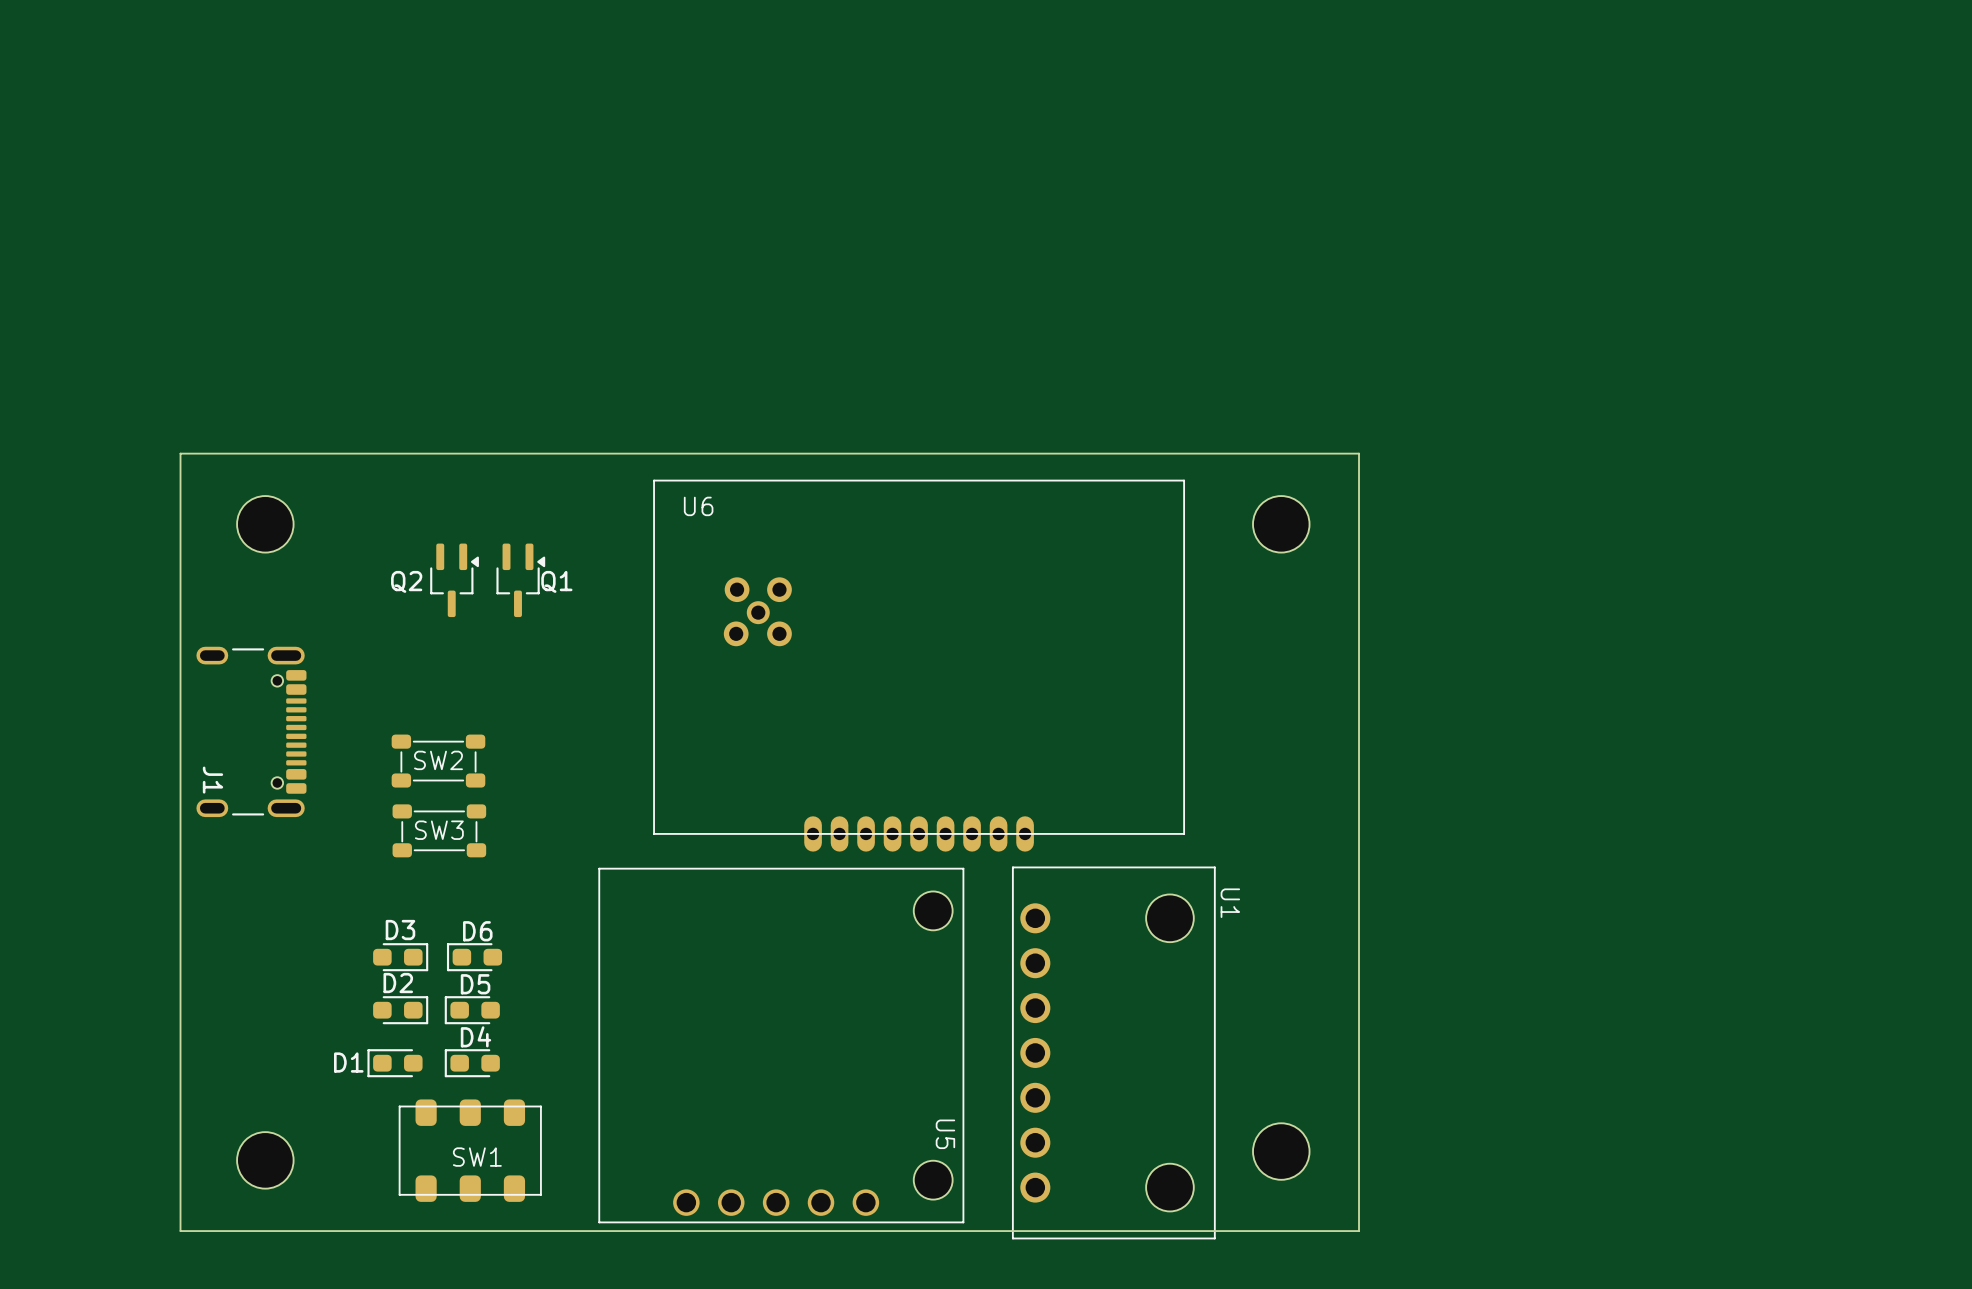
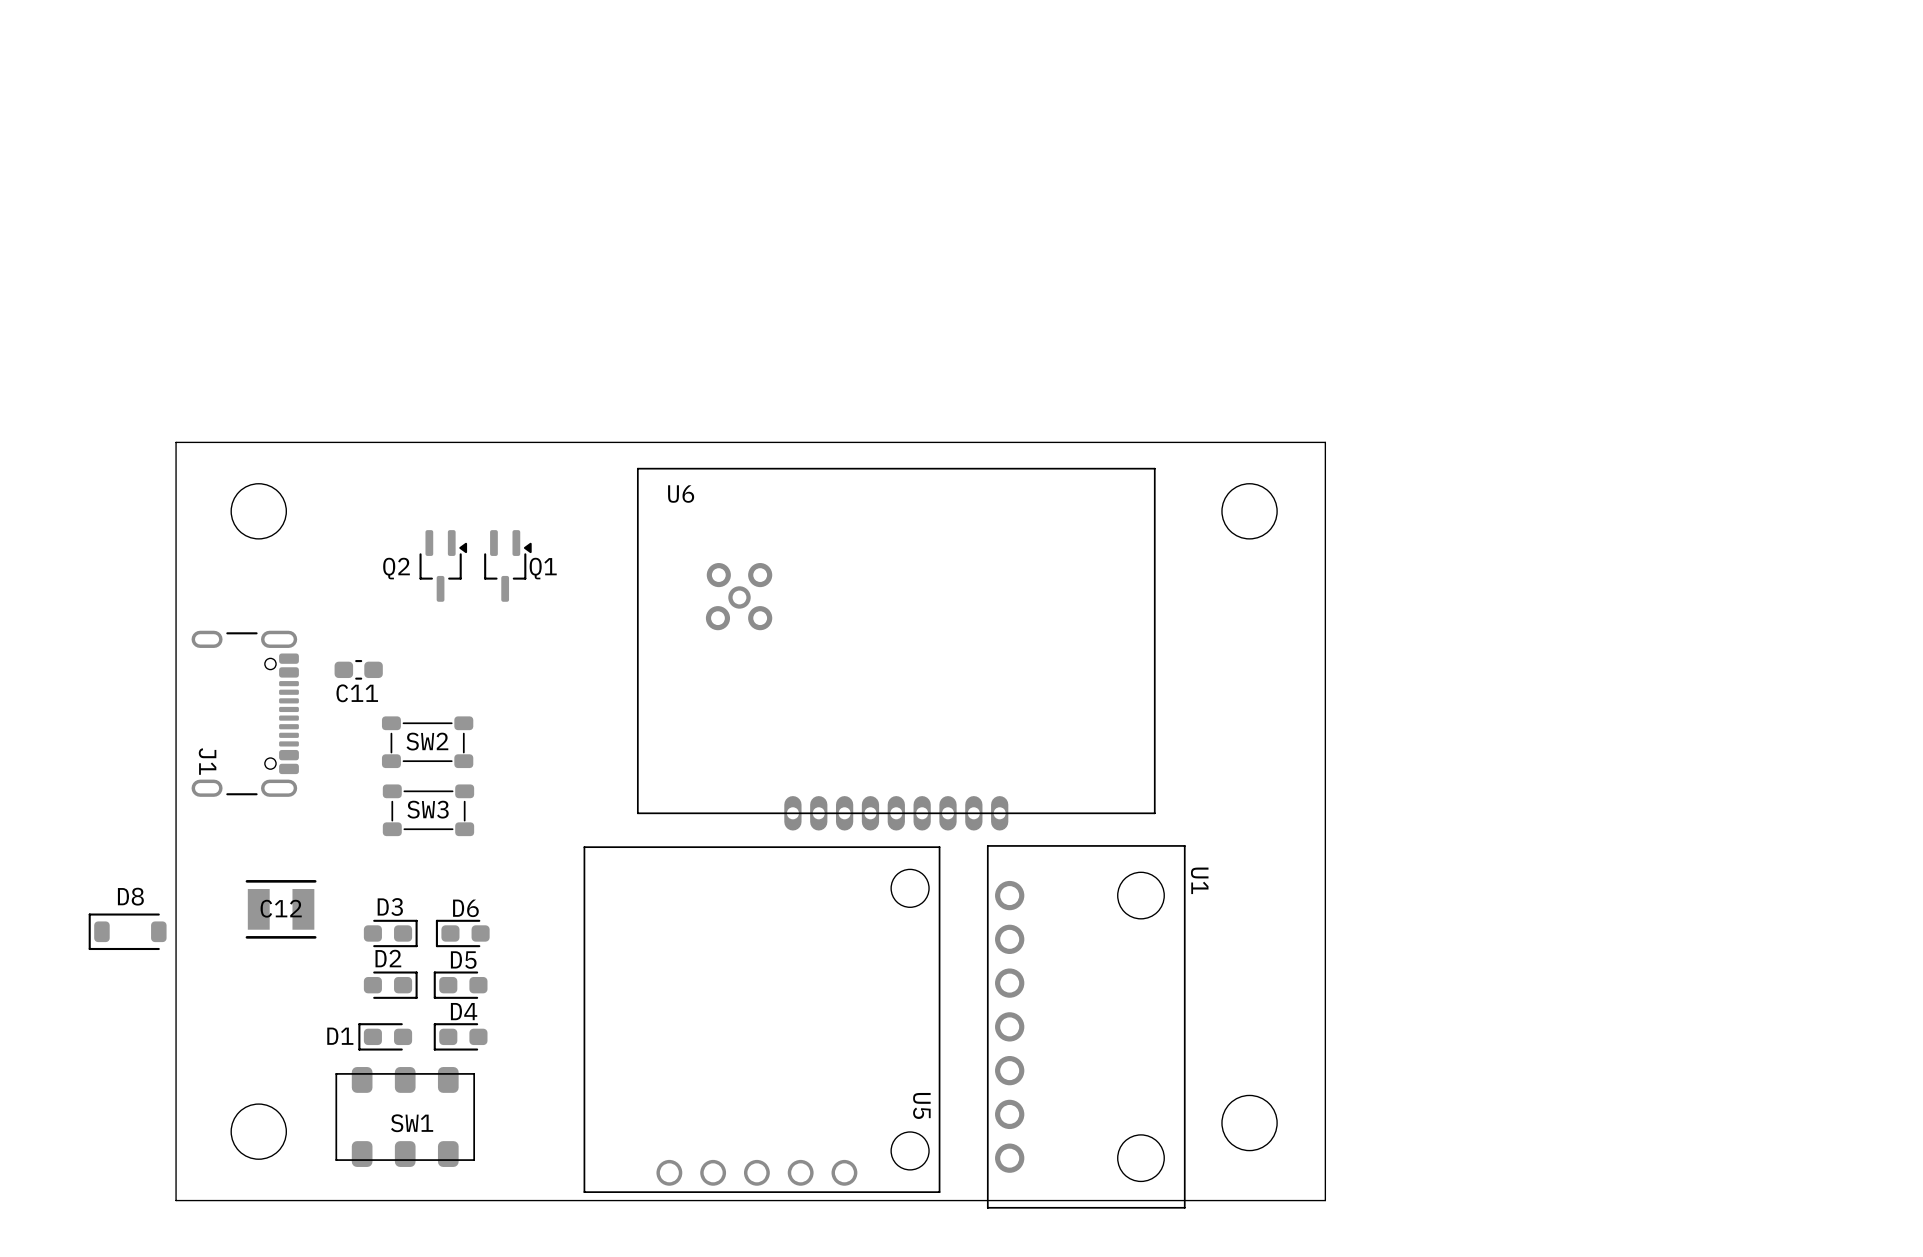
C11: none -> (358, 669)
C12: none -> (281, 909)
D8: none -> (127, 931)
SW1 position: (470, 1150) -> (405, 1116)

